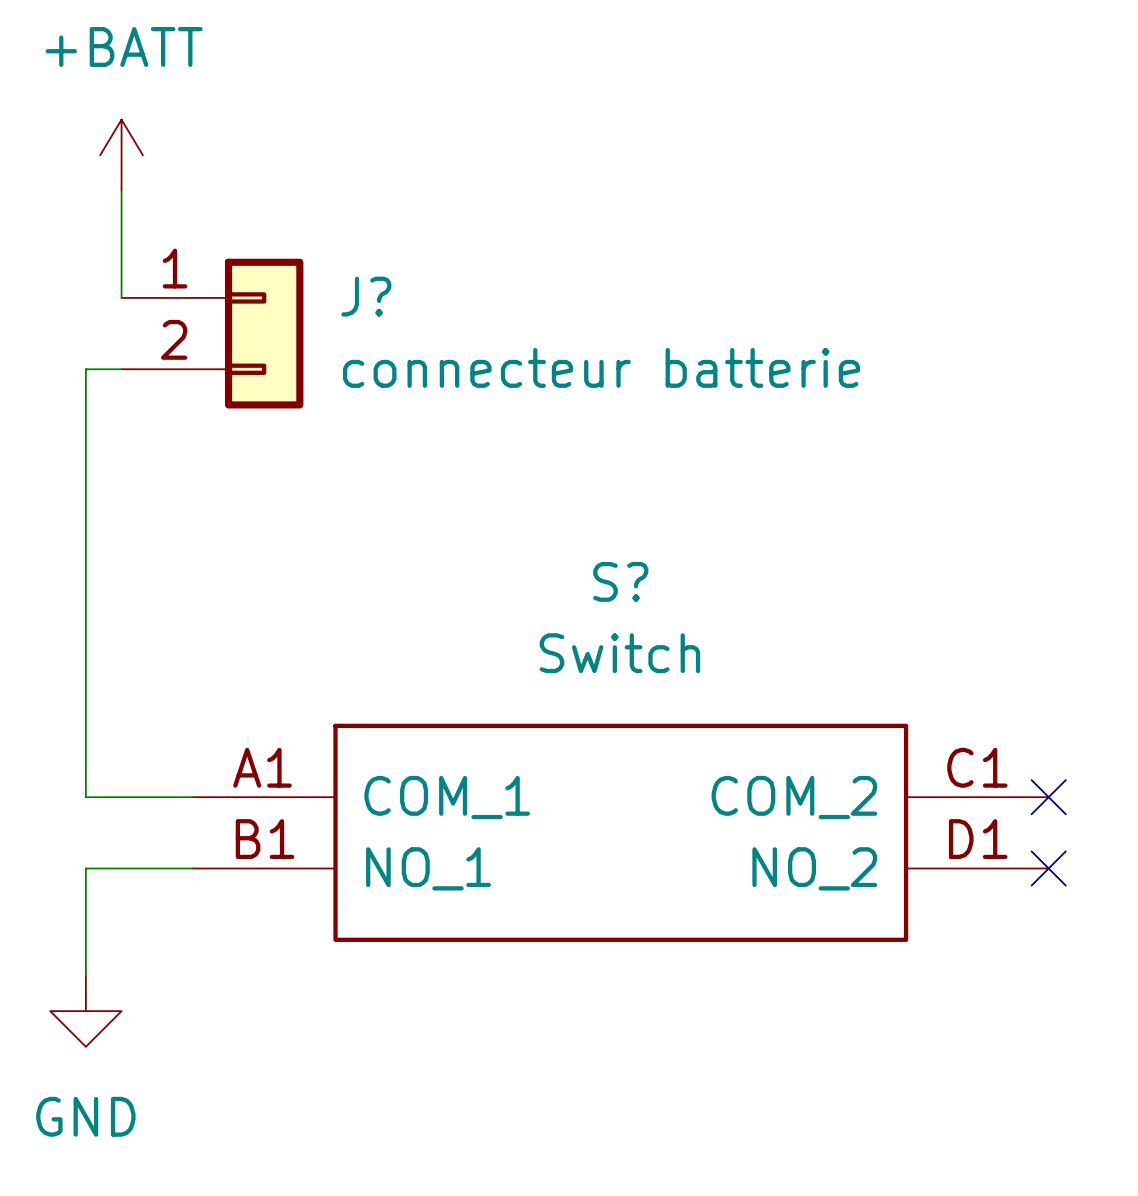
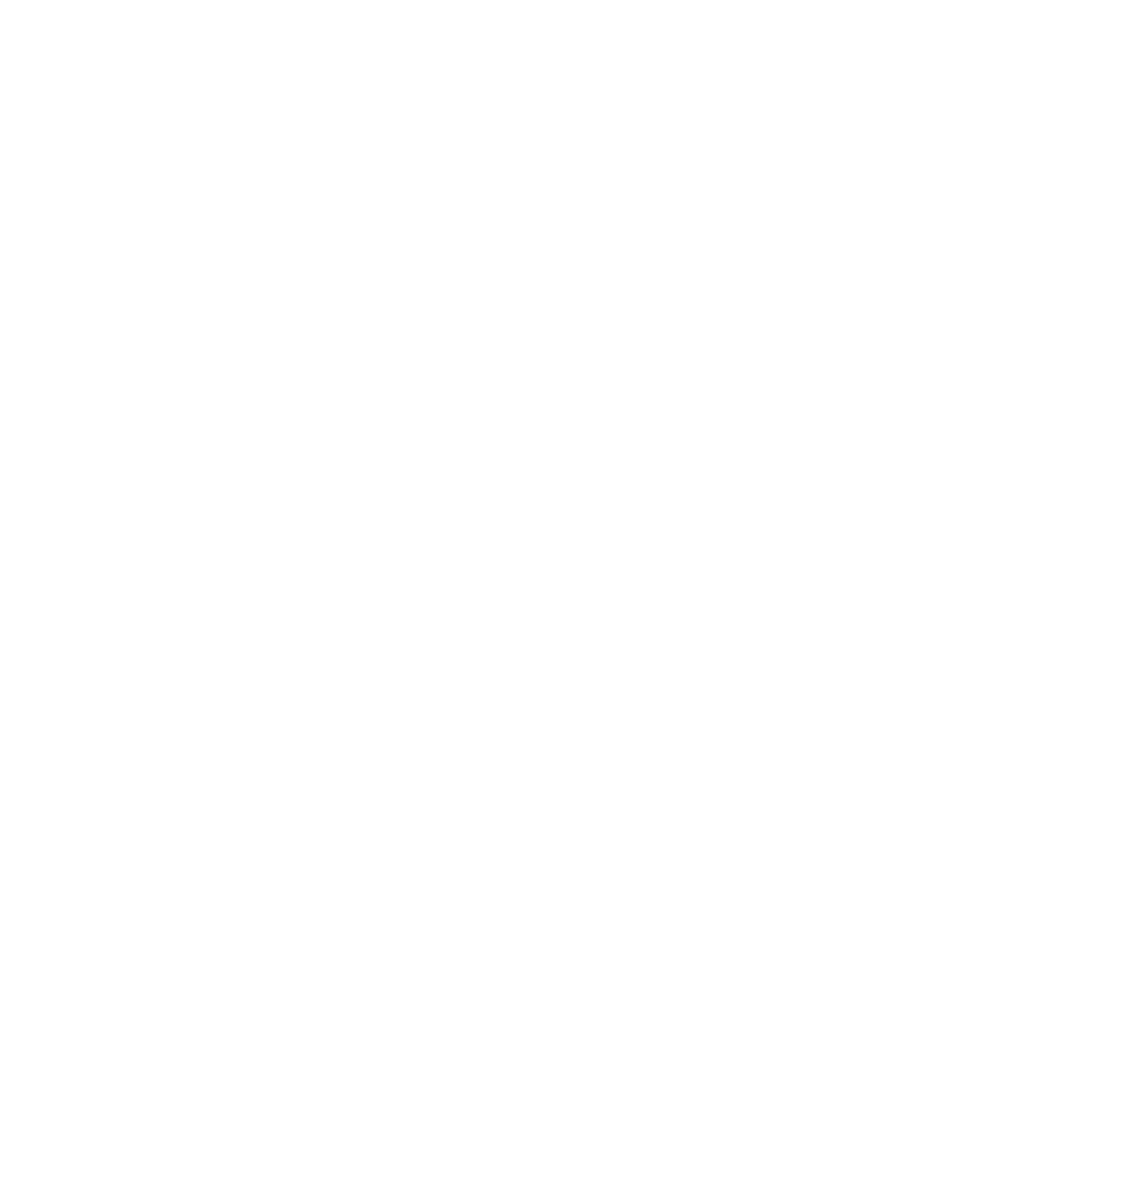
power symbol: +BATT (121, 155) -> none
wire: (121, 190) (121, 297) -> none
J?: connecteur batterie (212, 333) -> none
wire: (121, 369) (85, 369) (85, 797) (192, 797) -> none
no-connect mark: (1048, 797) -> none
S?: Switch (620, 832) -> none
wire: (192, 868) (85, 868) (85, 975) -> none
no-connect mark: (1048, 868) -> none
power symbol: GND (85, 1011) -> none

